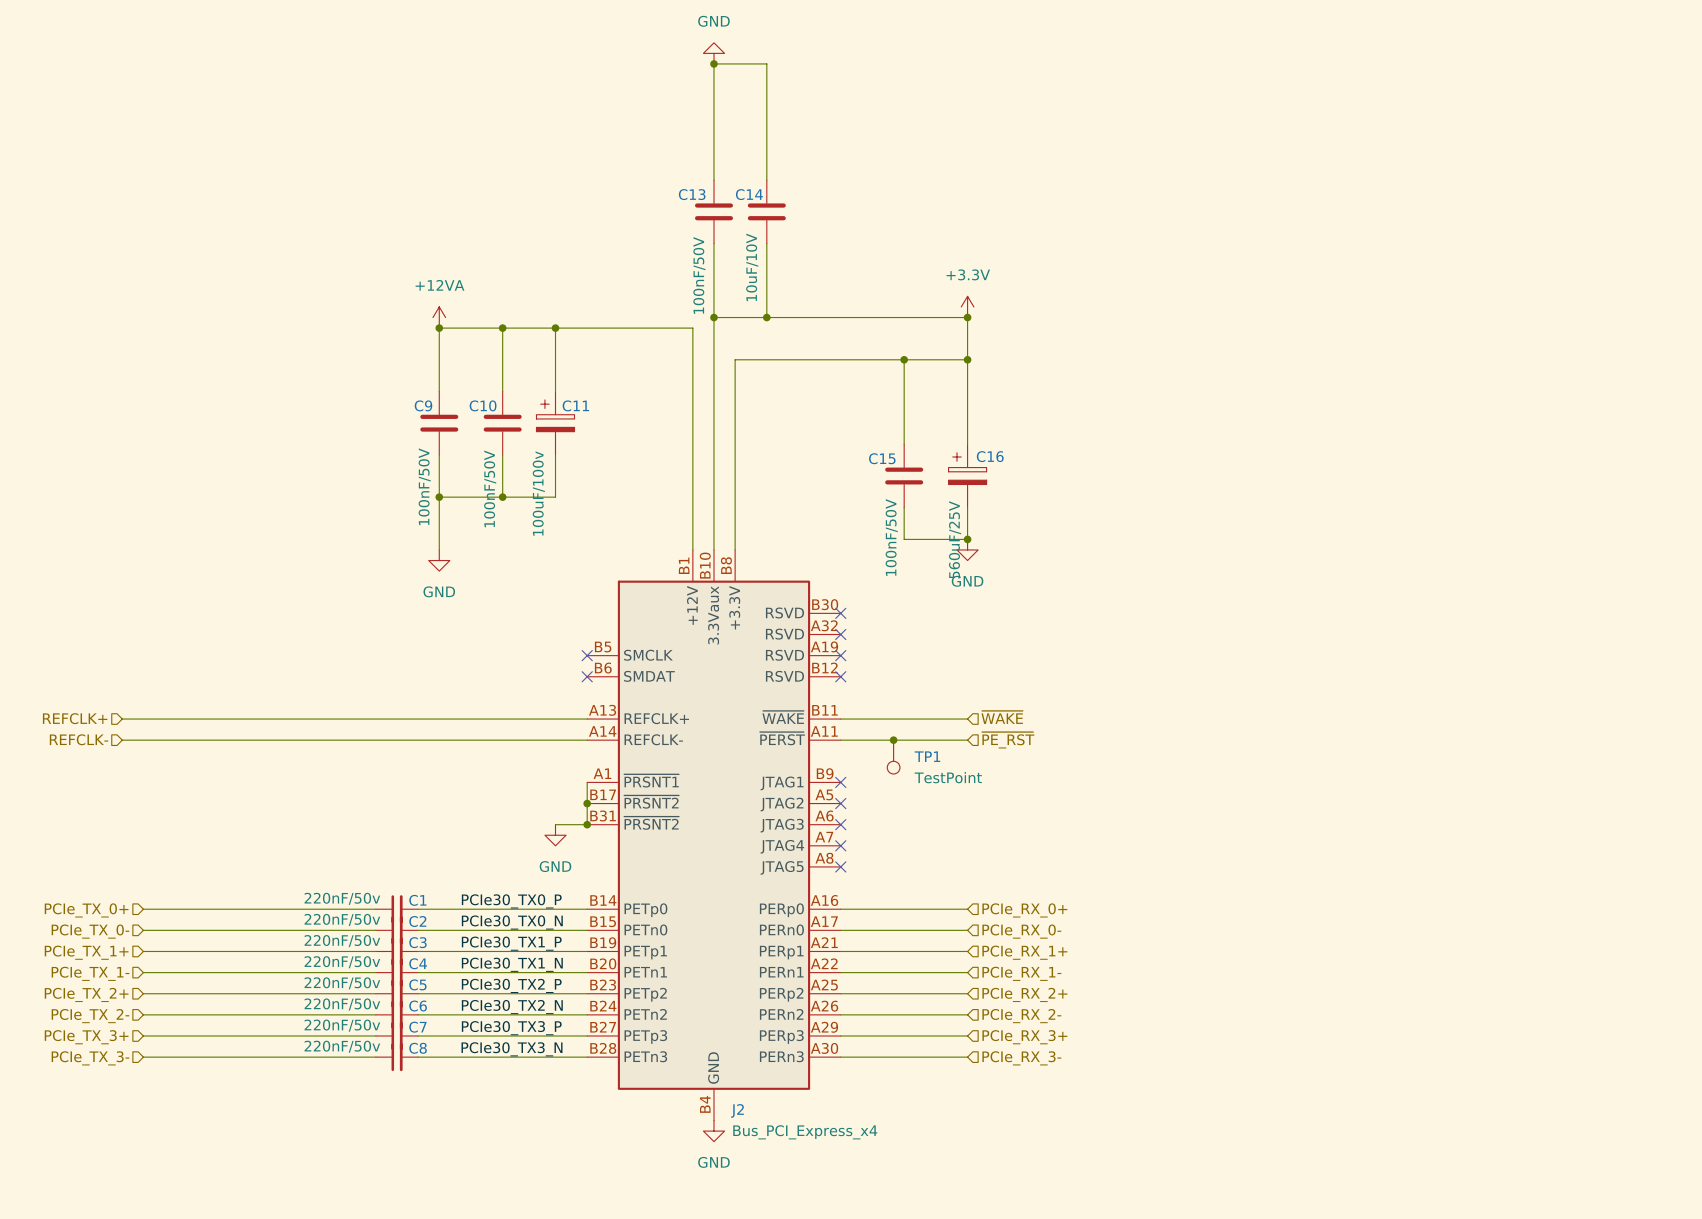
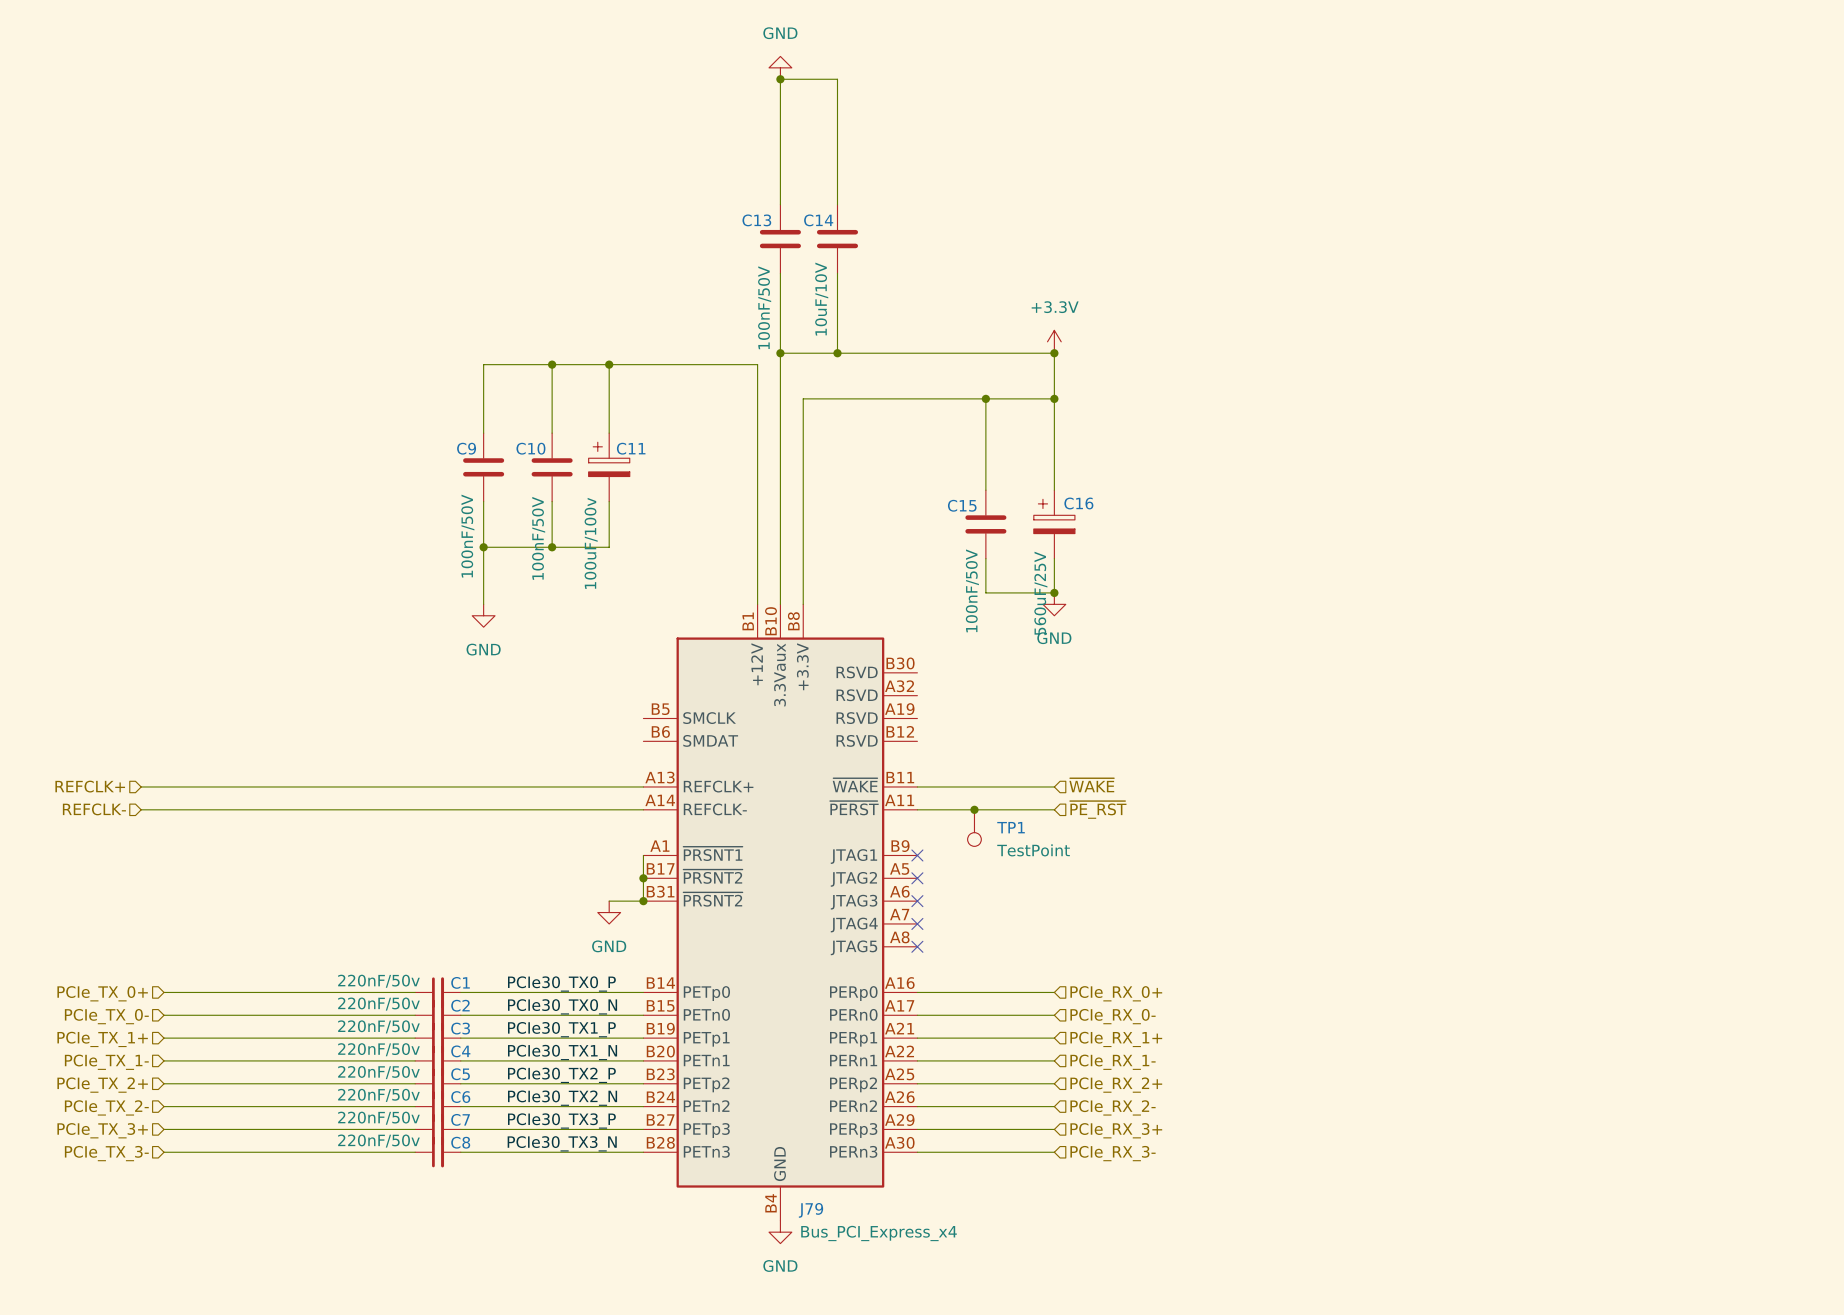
power symbol: +12VA (439, 317) -> none
junction: (439, 328) -> none
no-connect mark: (840, 613) -> none
no-connect mark: (840, 634) -> none
no-connect mark: (587, 655) -> none
no-connect mark: (840, 655) -> none
no-connect mark: (587, 676) -> none
no-connect mark: (840, 676) -> none
J2 name: J2 (737, 1110) -> J79 (810, 1210)

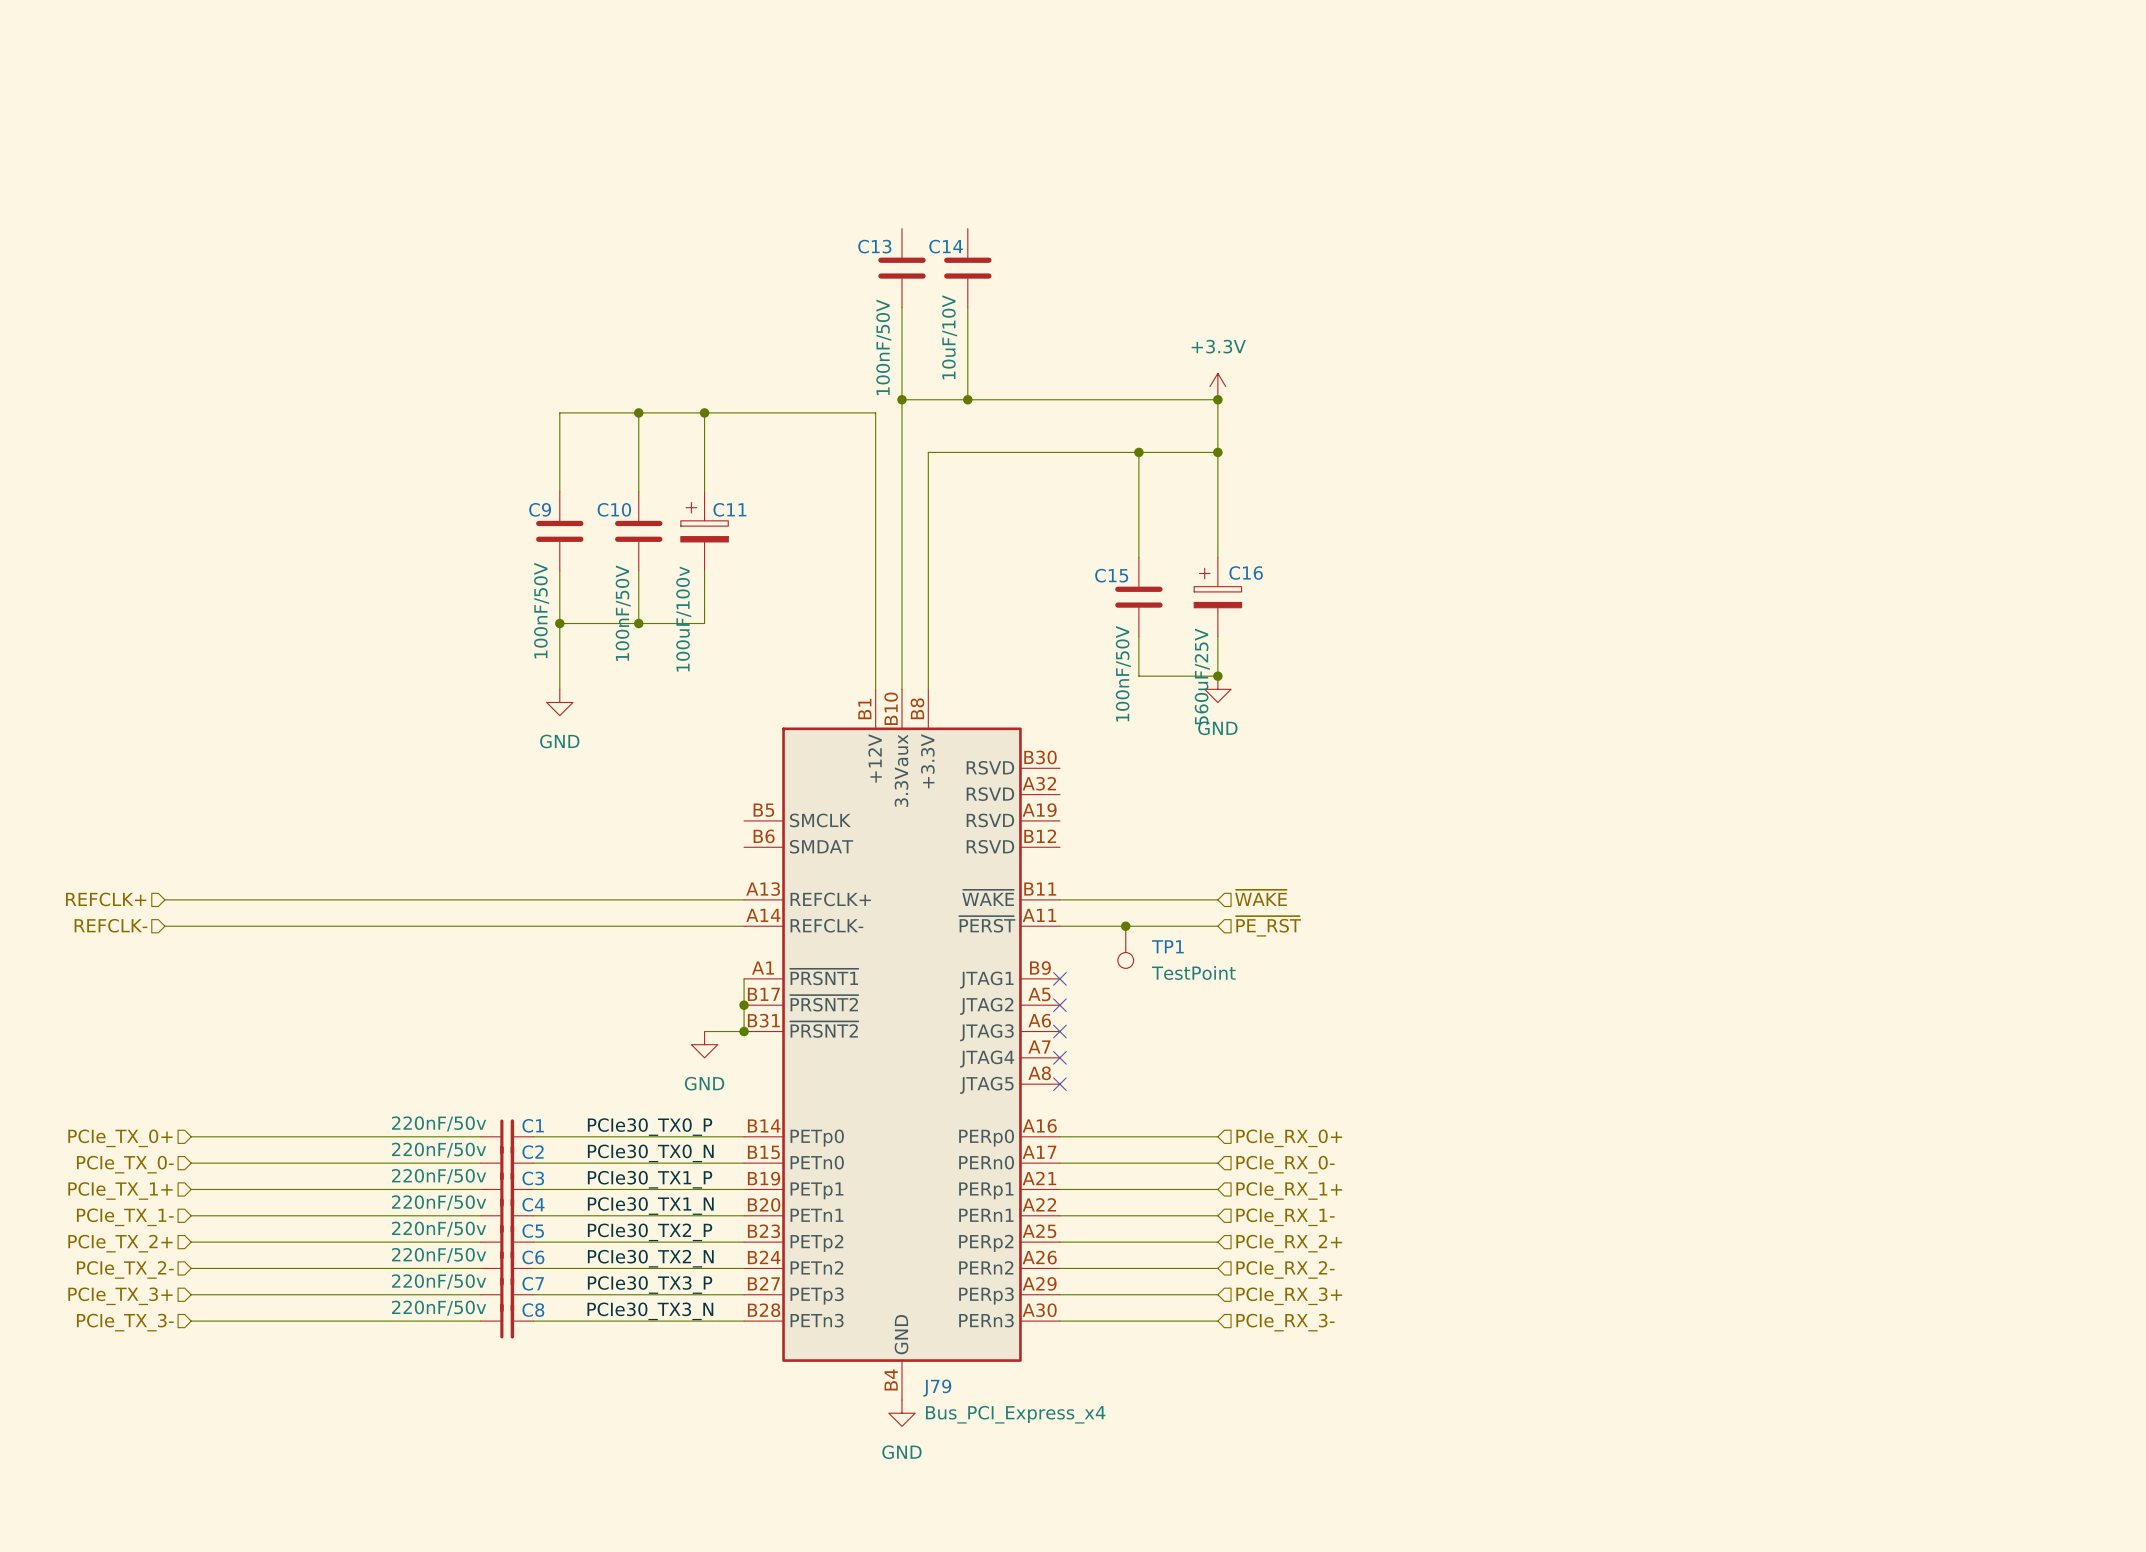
power symbol: GND (780, 67) -> none
junction: (780, 79) -> none
wire: (780, 204) (780, 79) (837, 79) (837, 204) -> none

